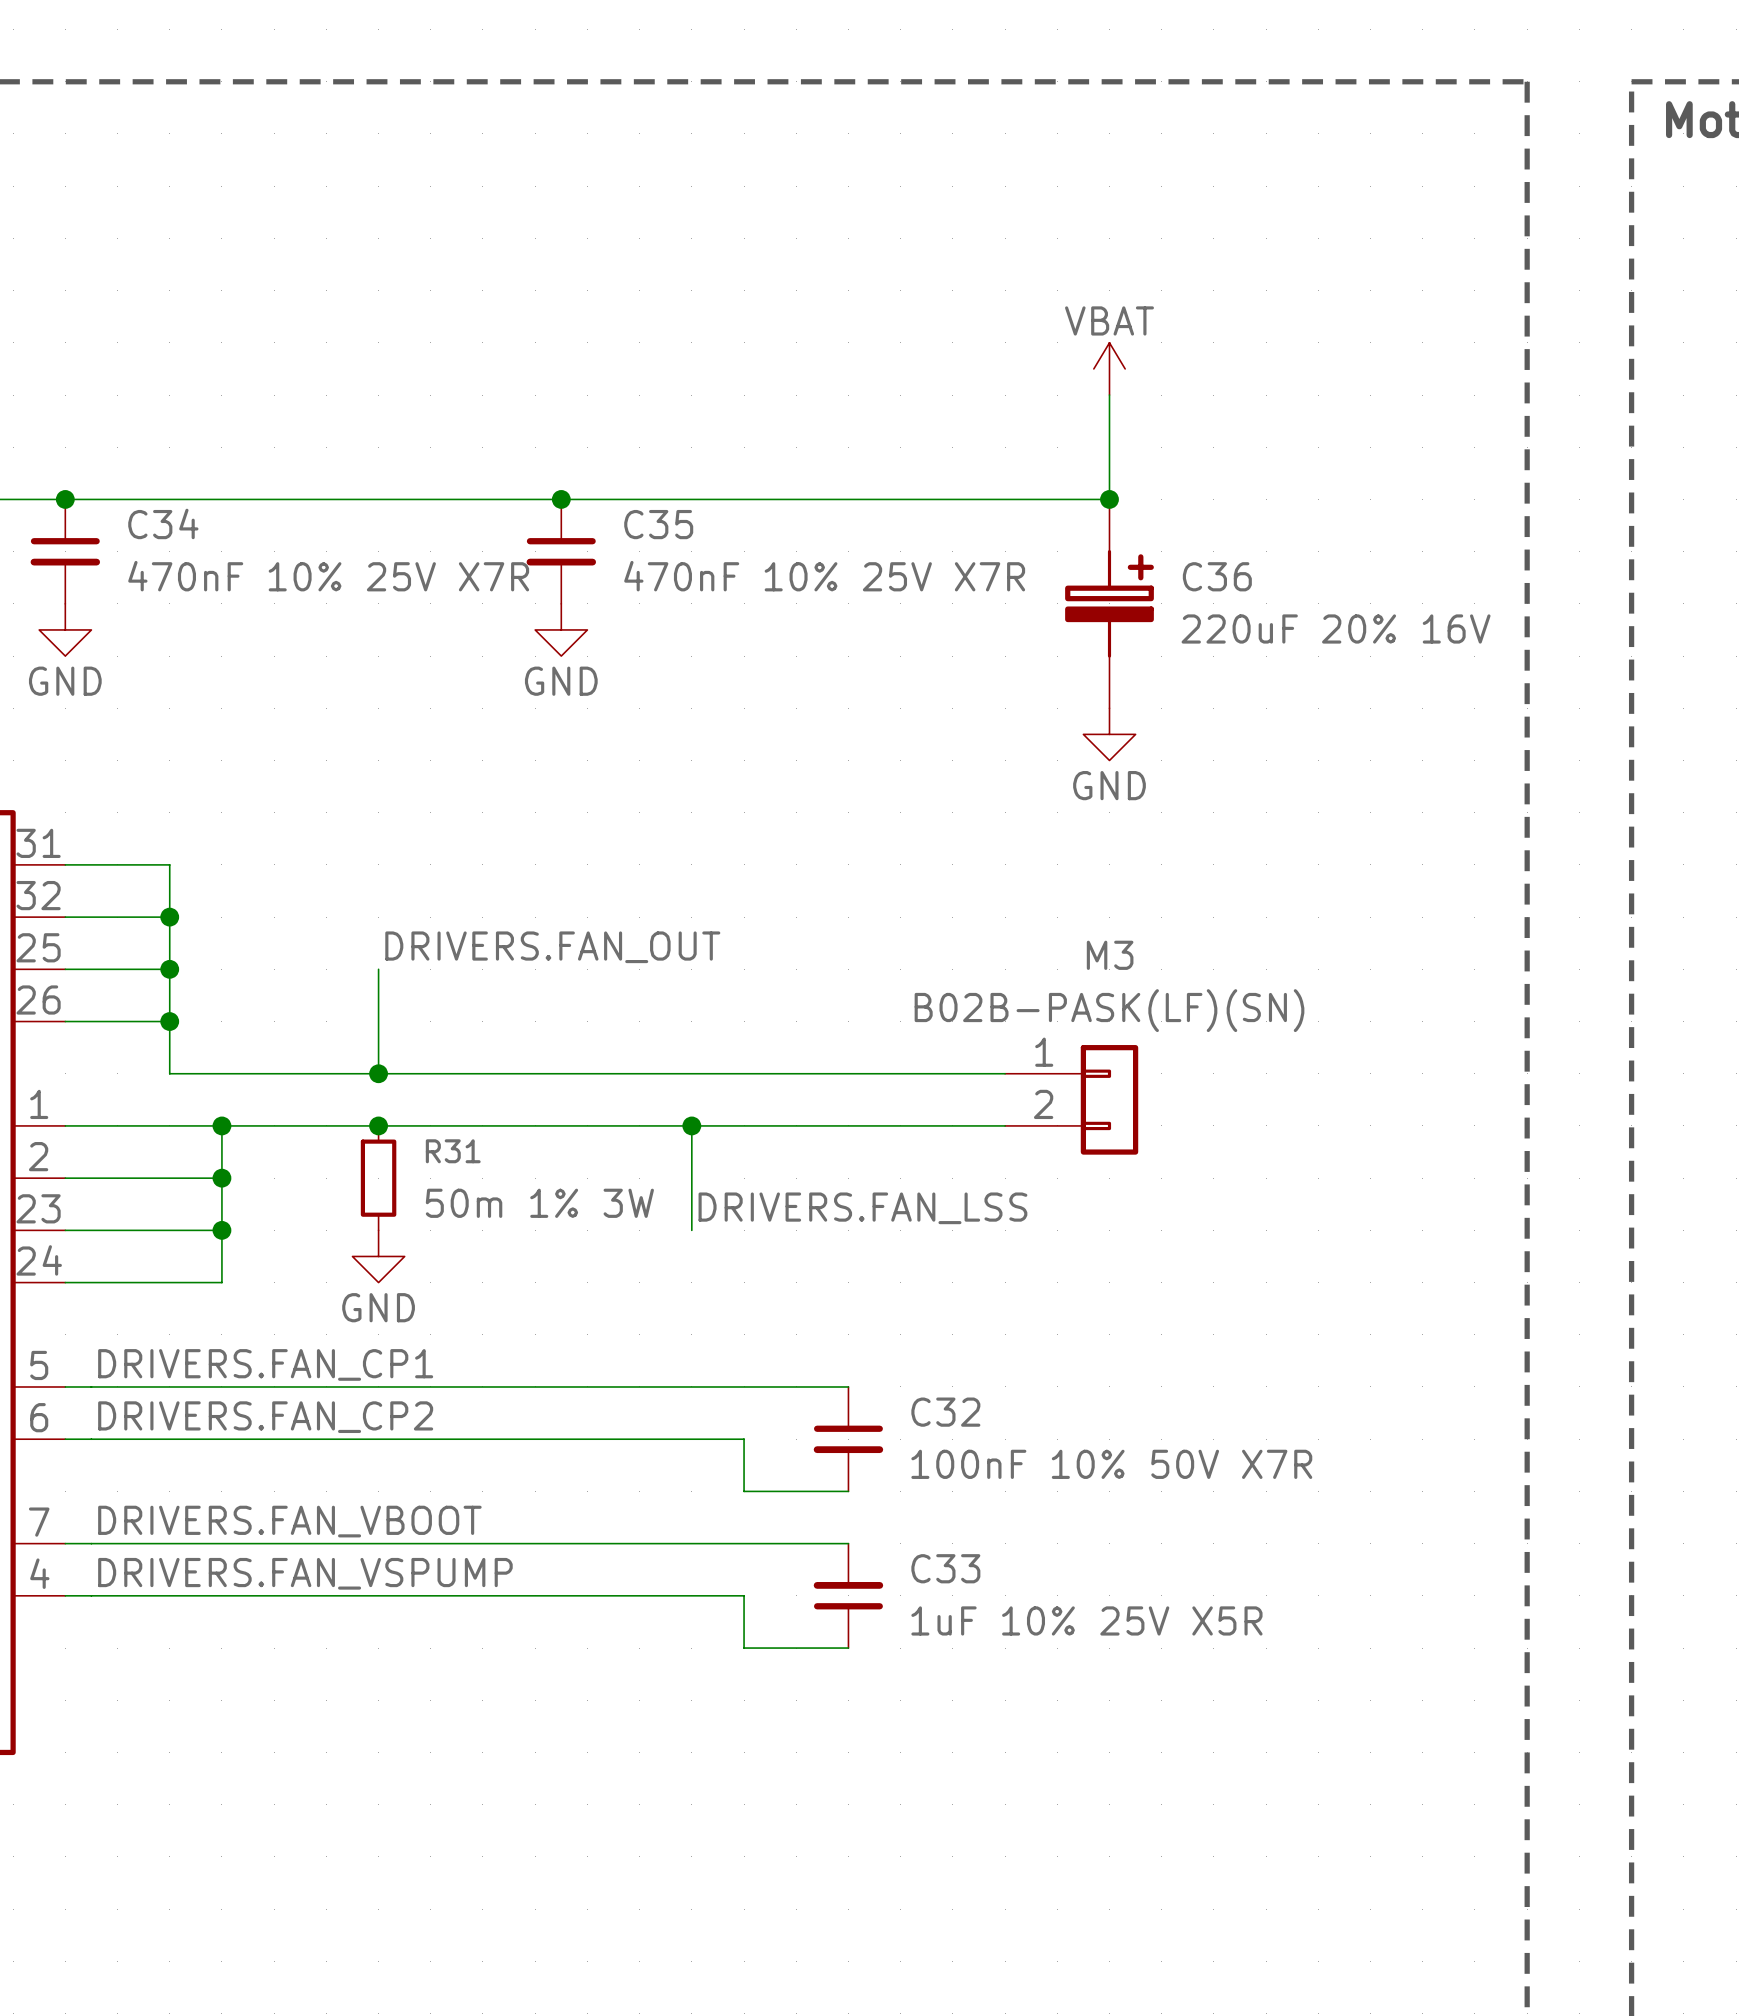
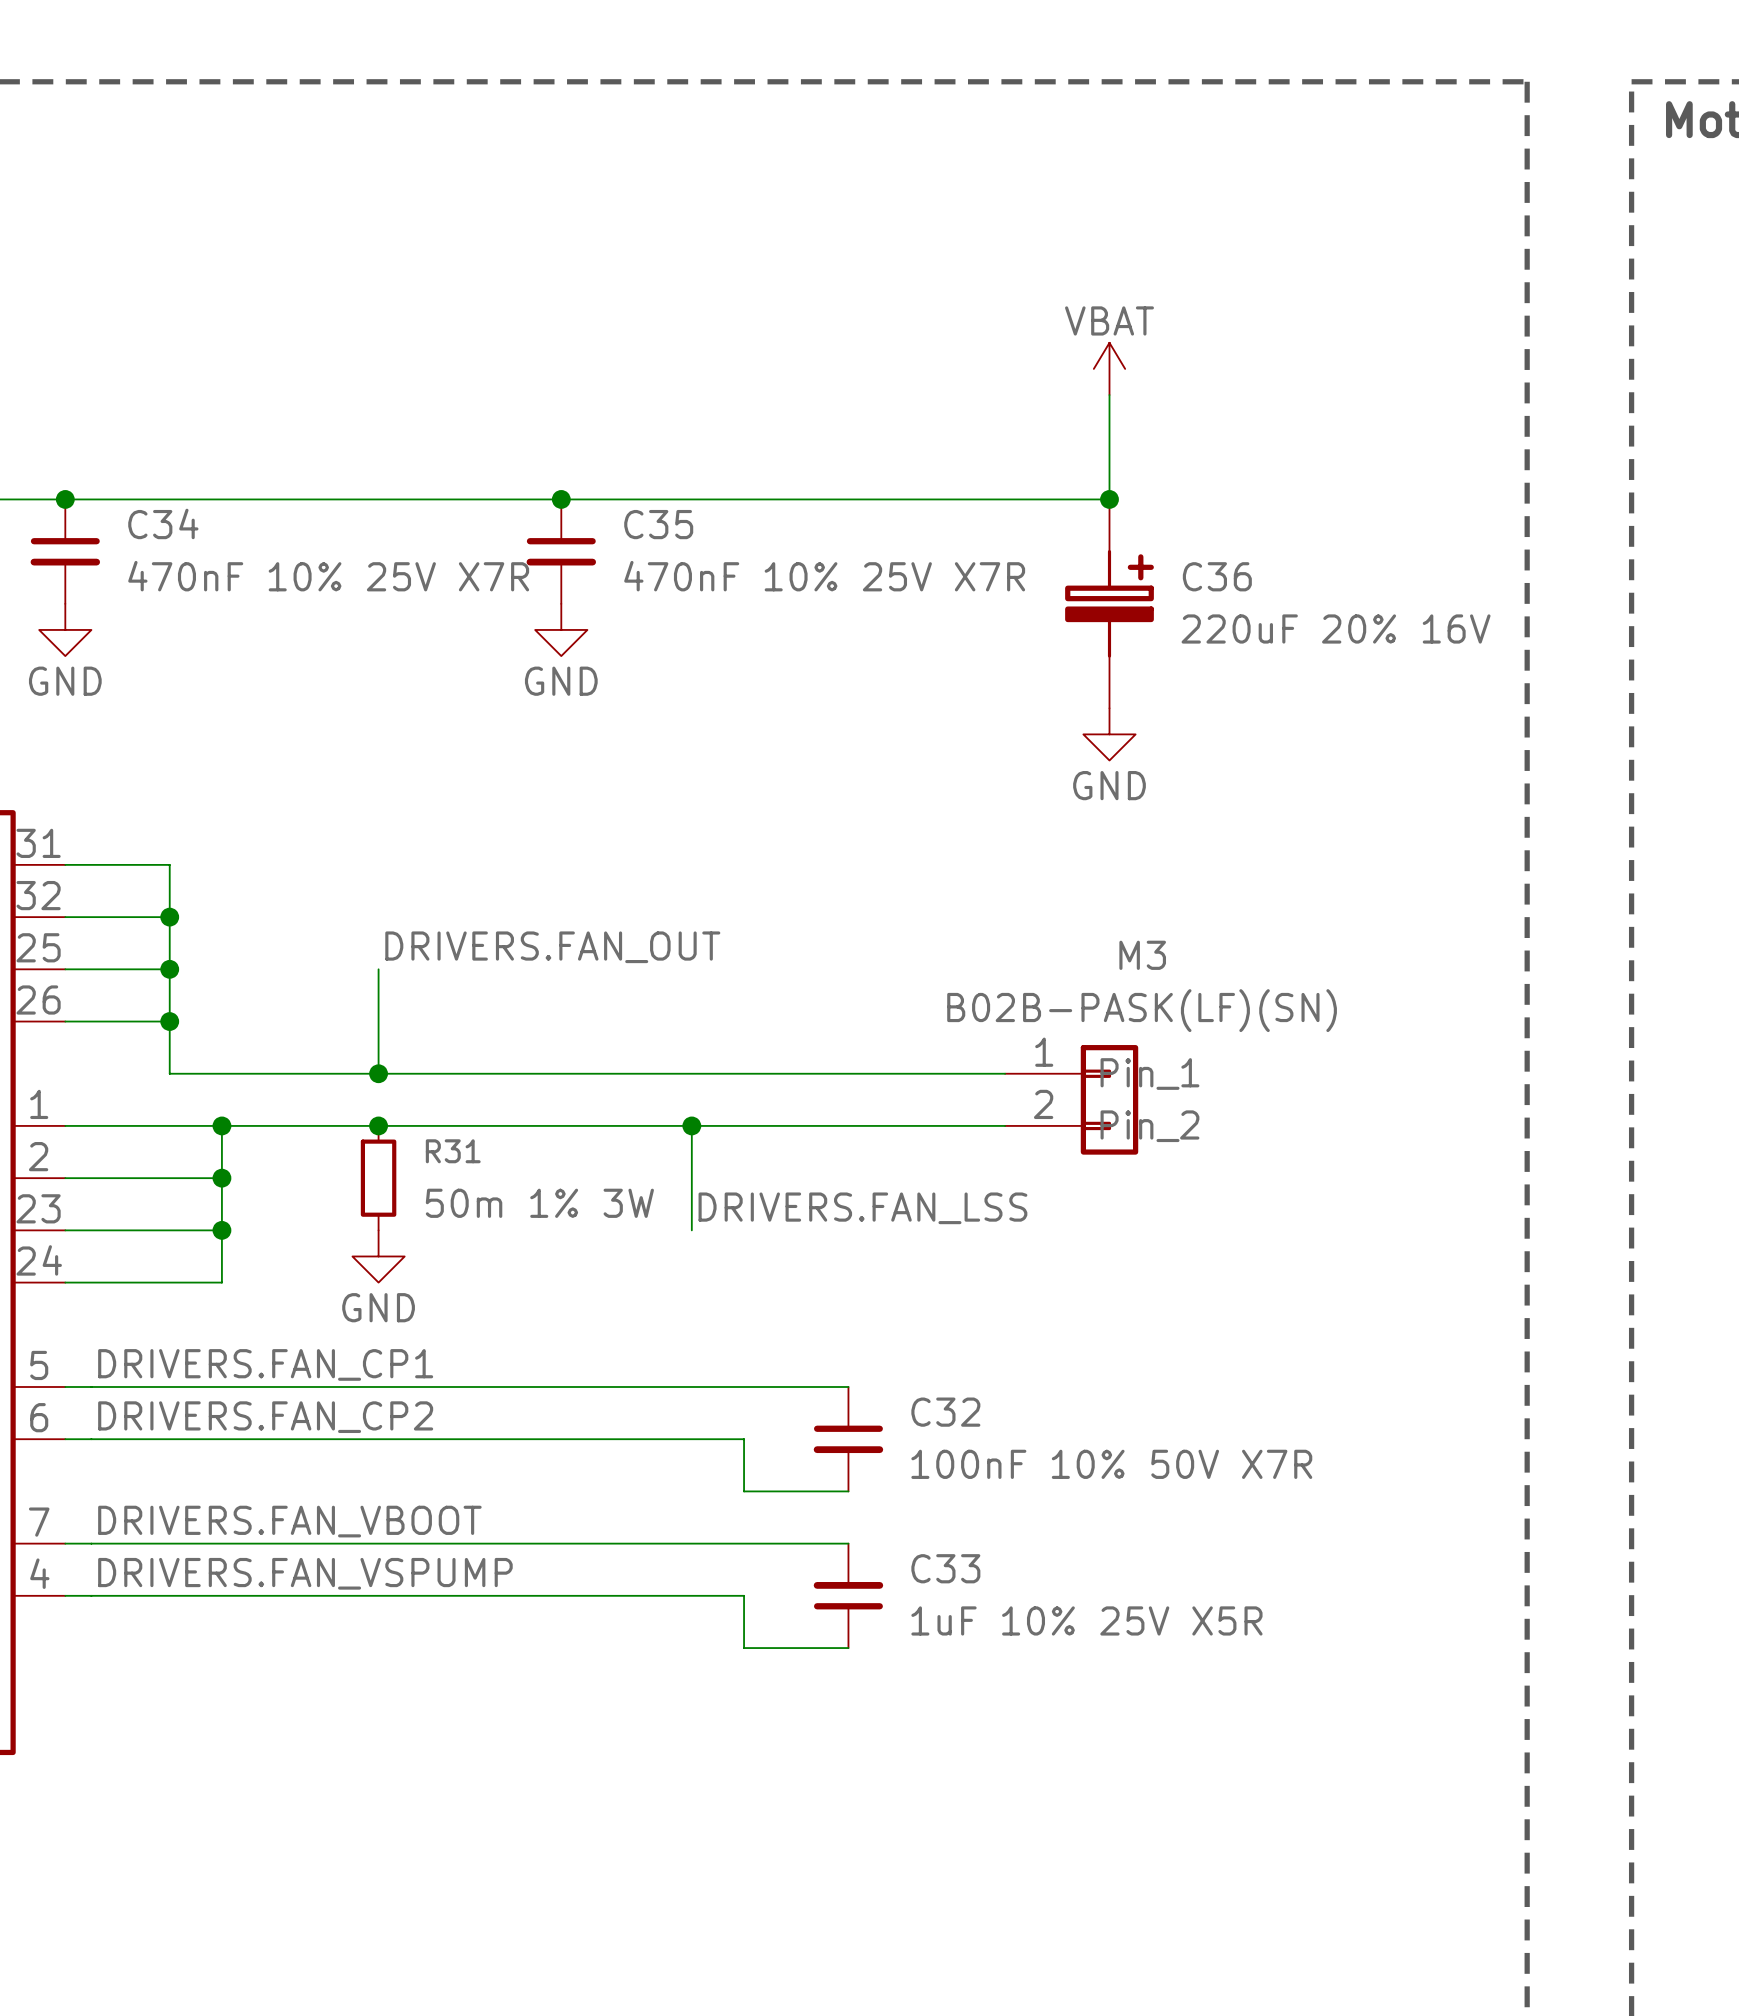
M3 name position: M3 (1110, 955) -> M3 (1142, 955)
M3 value position: B02B-PASK(LF)(SN) (1109, 1010) -> B02B-PASK(LF)(SN) (1142, 1010)
M3 pin name: none -> Pin_1 (1149, 1074)
M3 pin name: none -> Pin_2 (1149, 1126)

